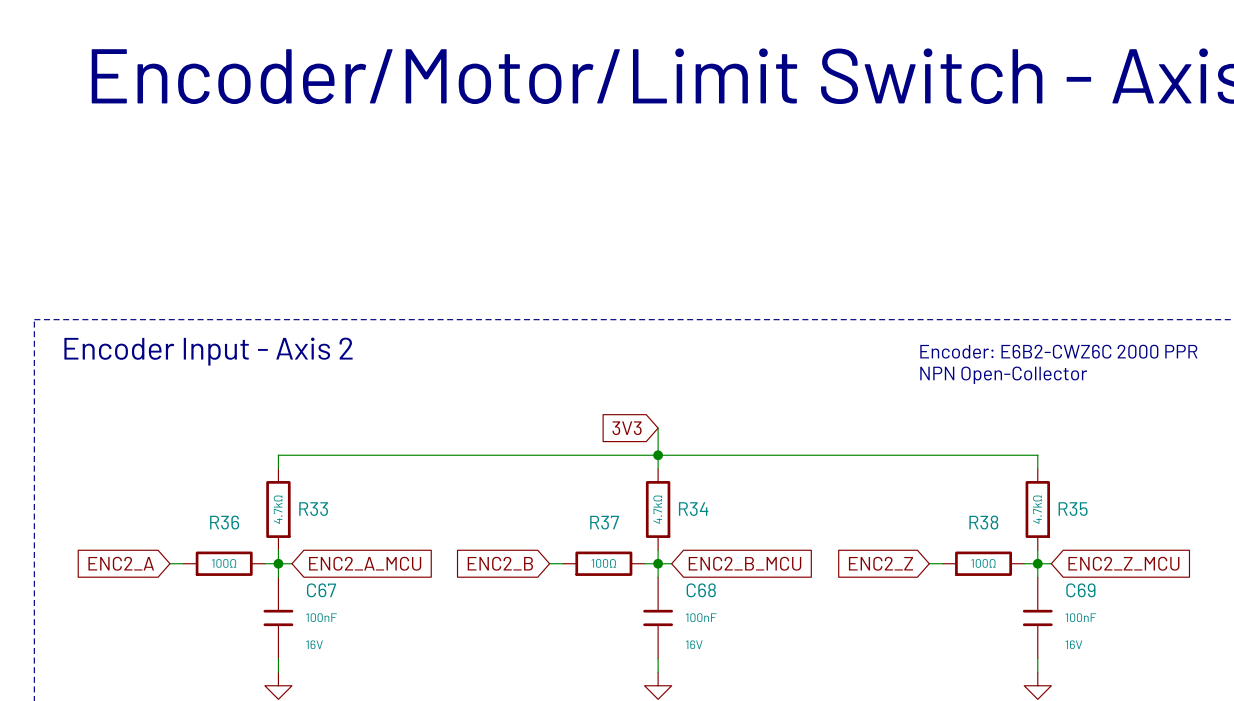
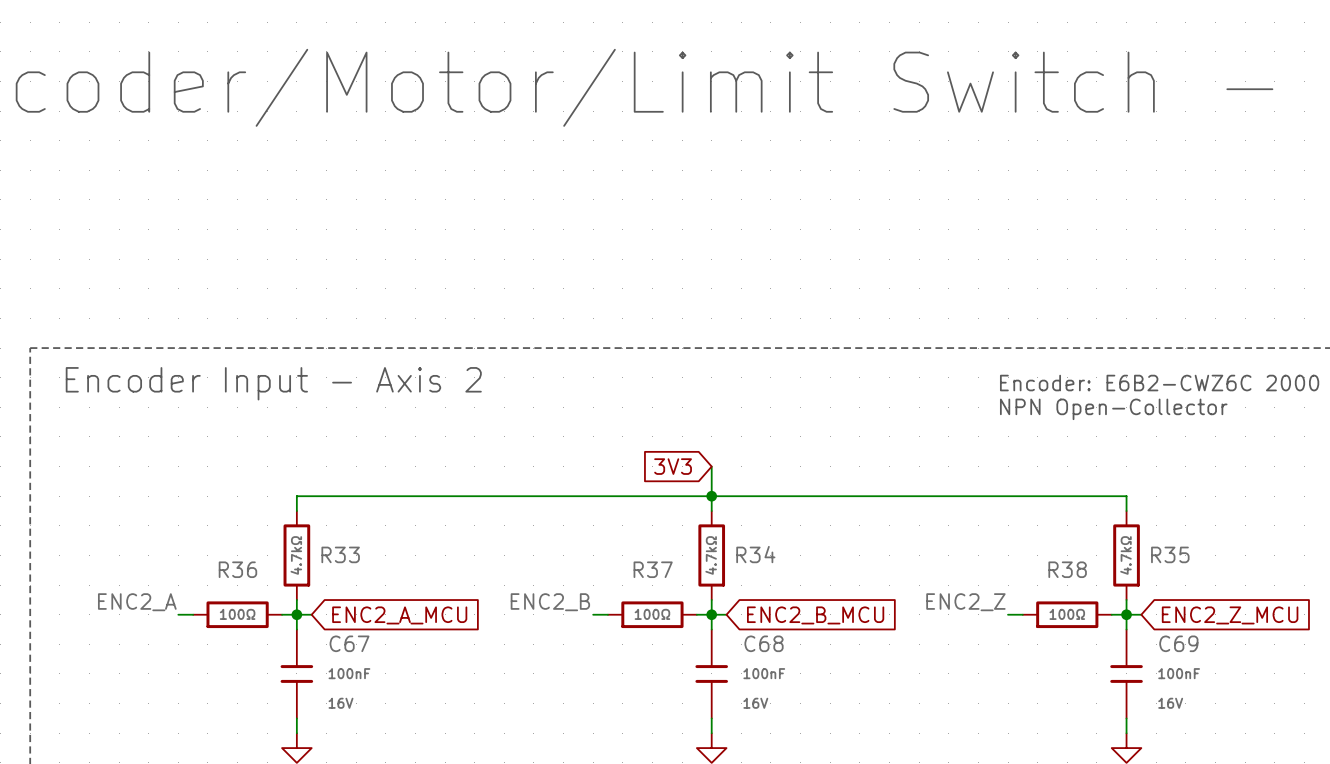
label: none -> ENC2_A (137, 602)
label: none -> ENC2_B (550, 602)
label: none -> ENC2_Z (965, 602)
global label: ENC2_A (121, 563) -> none
global label: ENC2_B (500, 563) -> none
global label: ENC2_Z (880, 563) -> none

